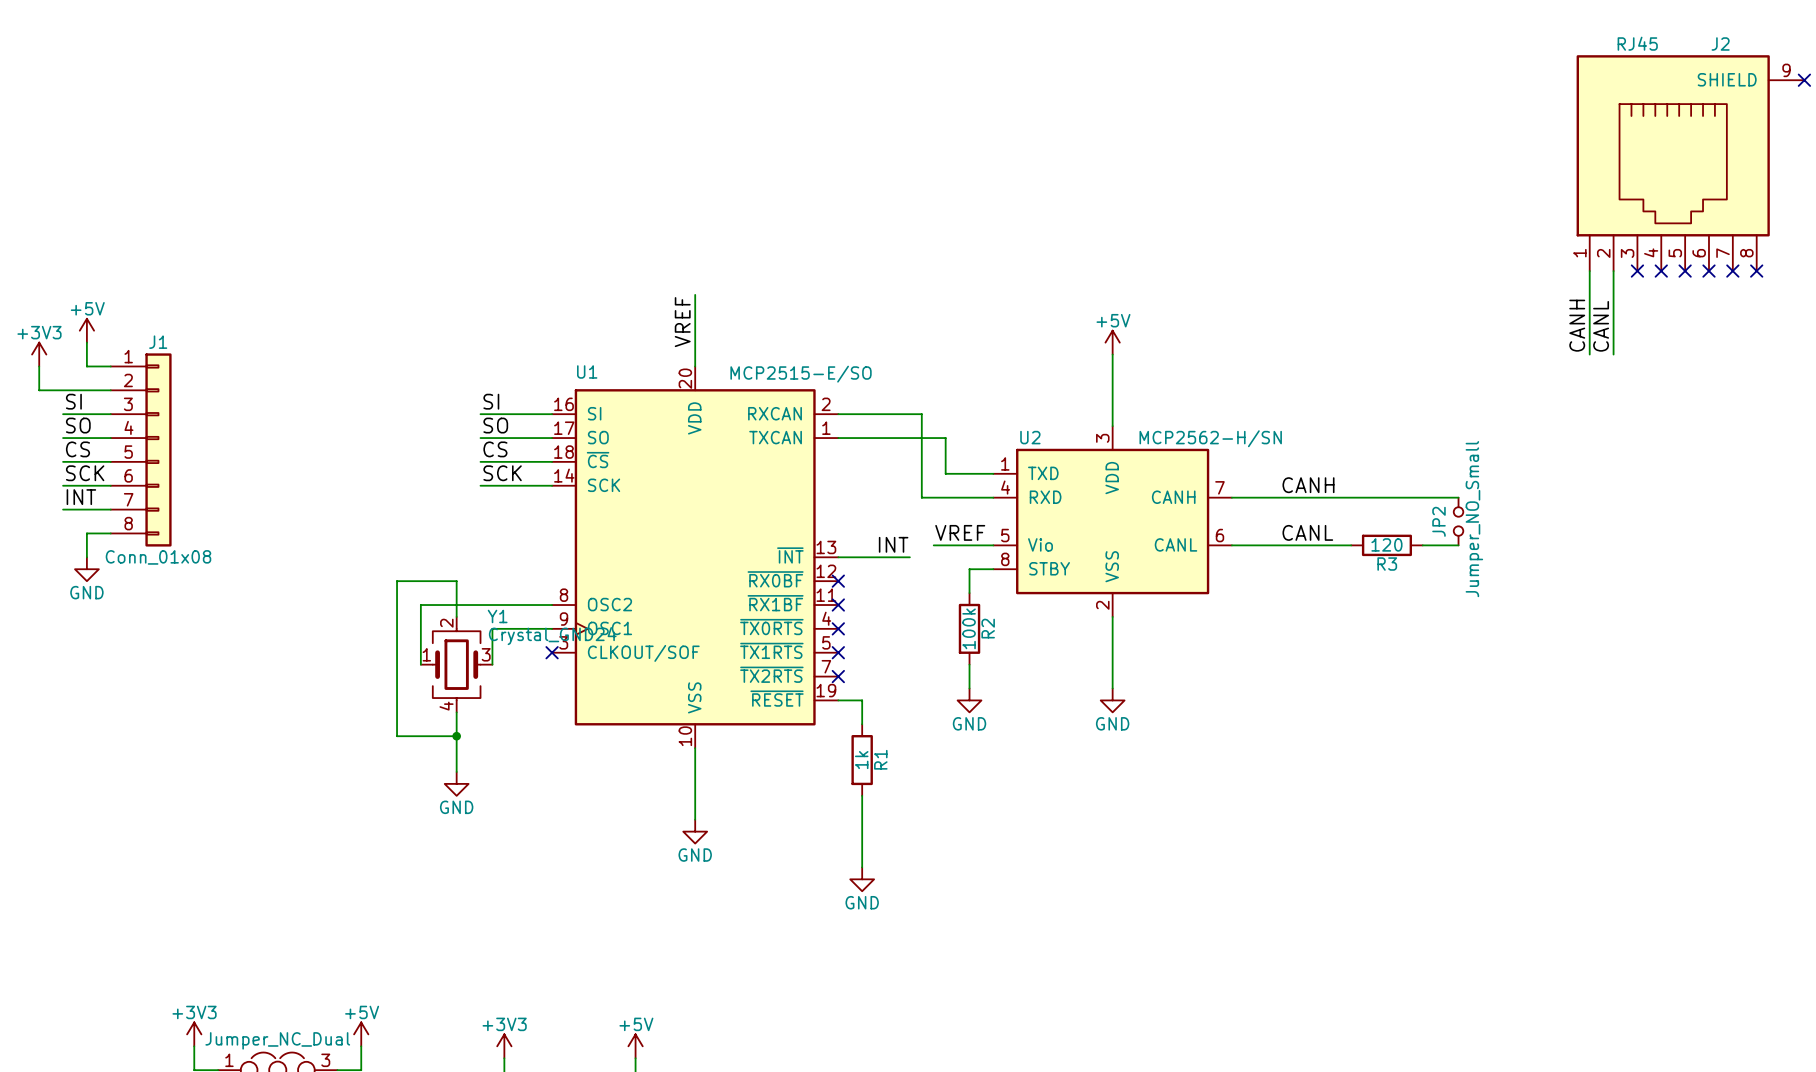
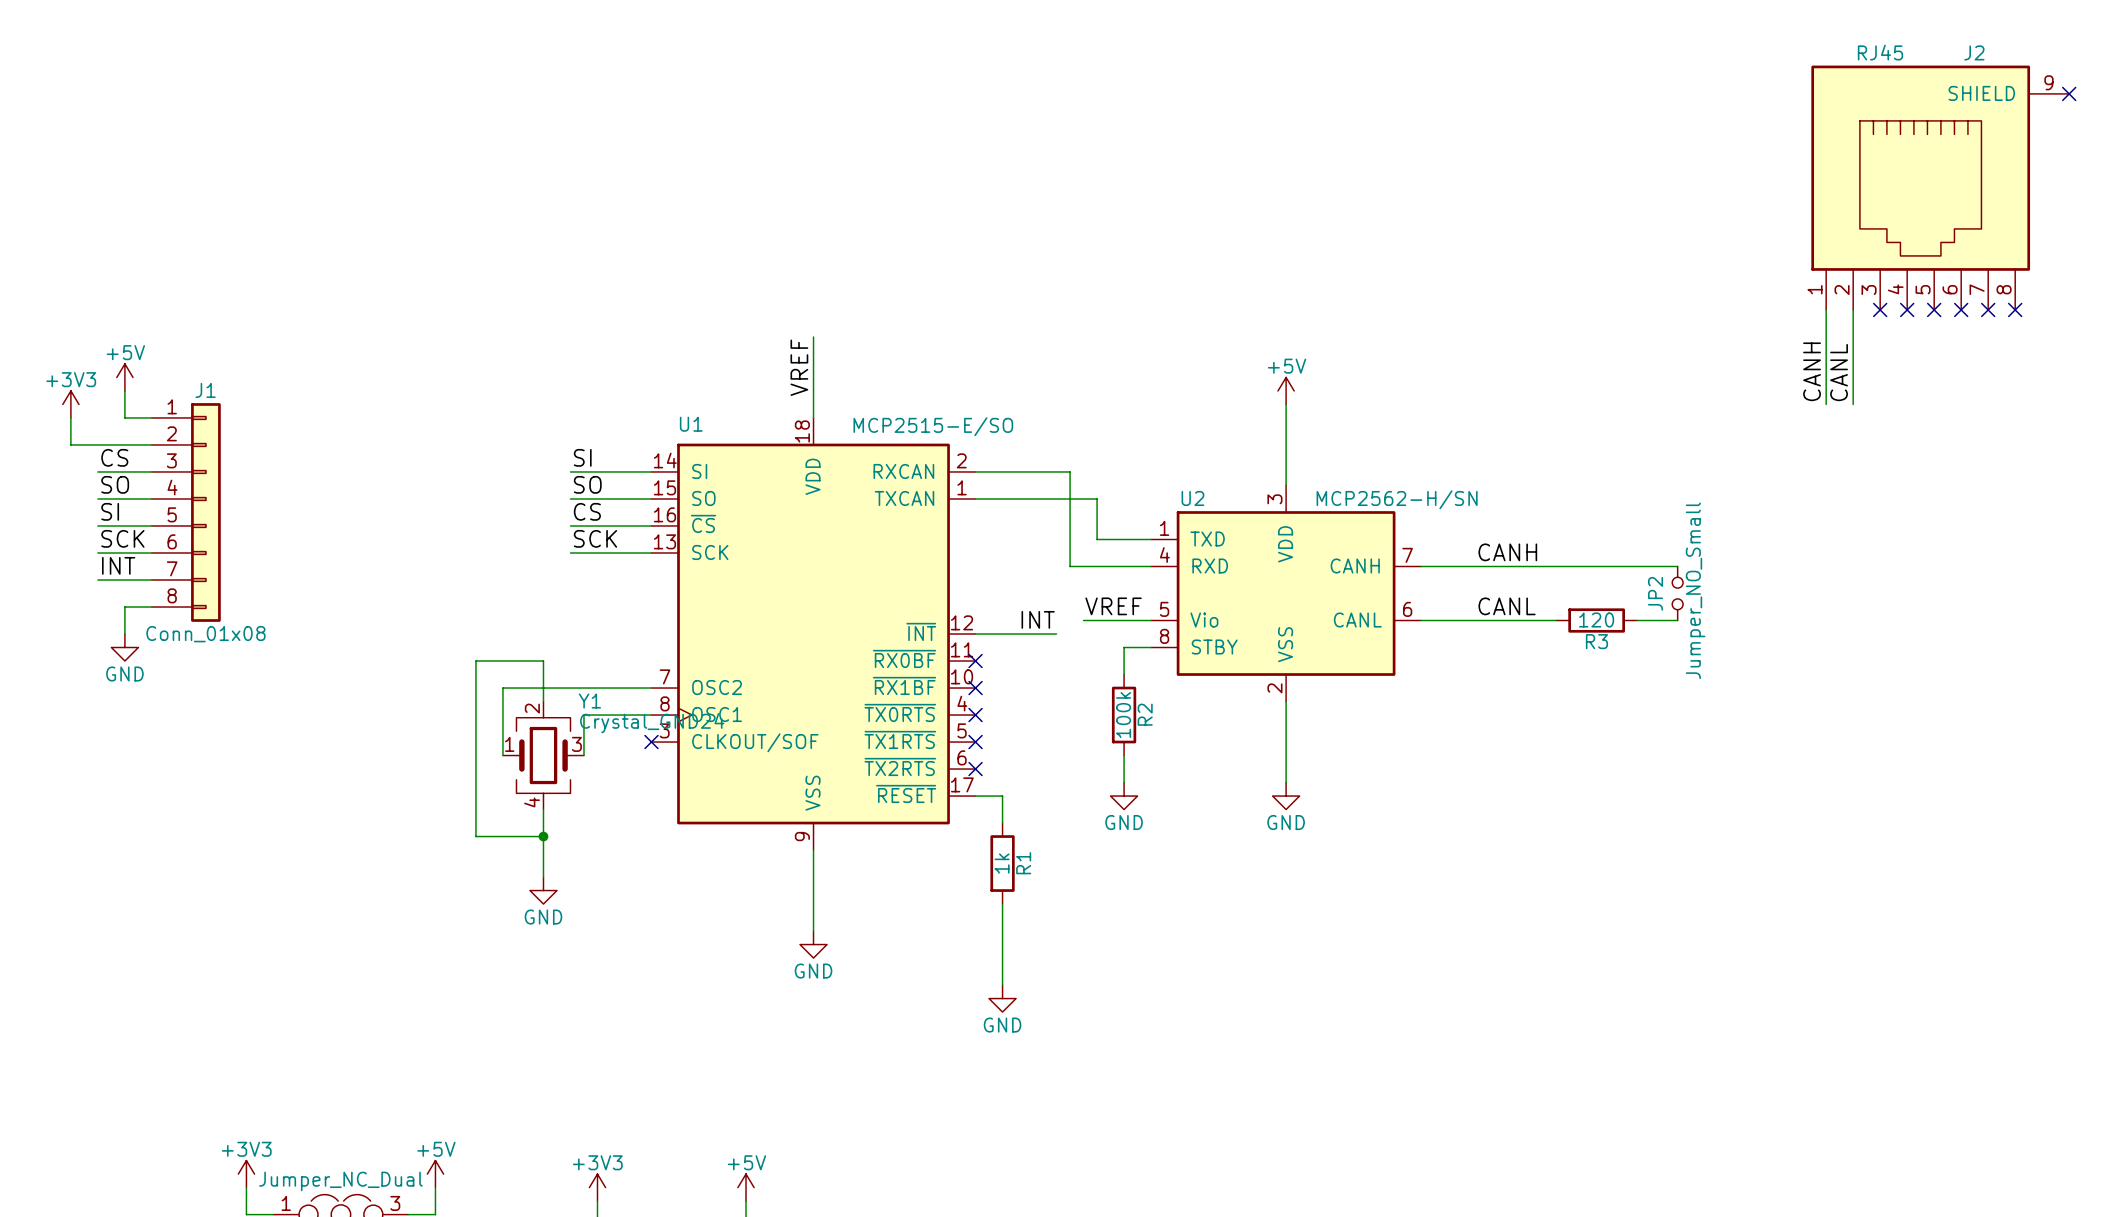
U1 symbol: [552, 366, 839, 749] -> [651, 417, 976, 851]
label: SI (73, 401) -> CS (114, 457)
label: CS (77, 449) -> SI (110, 511)

